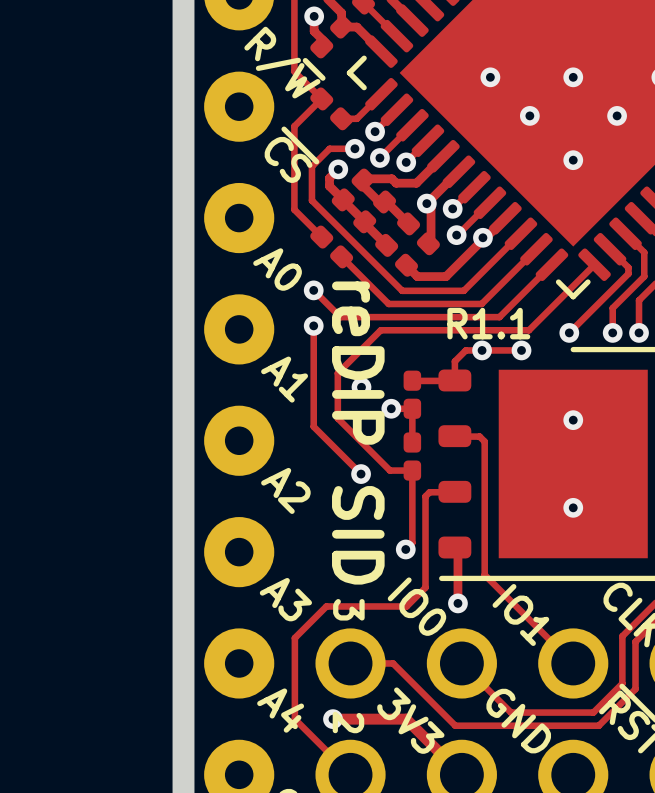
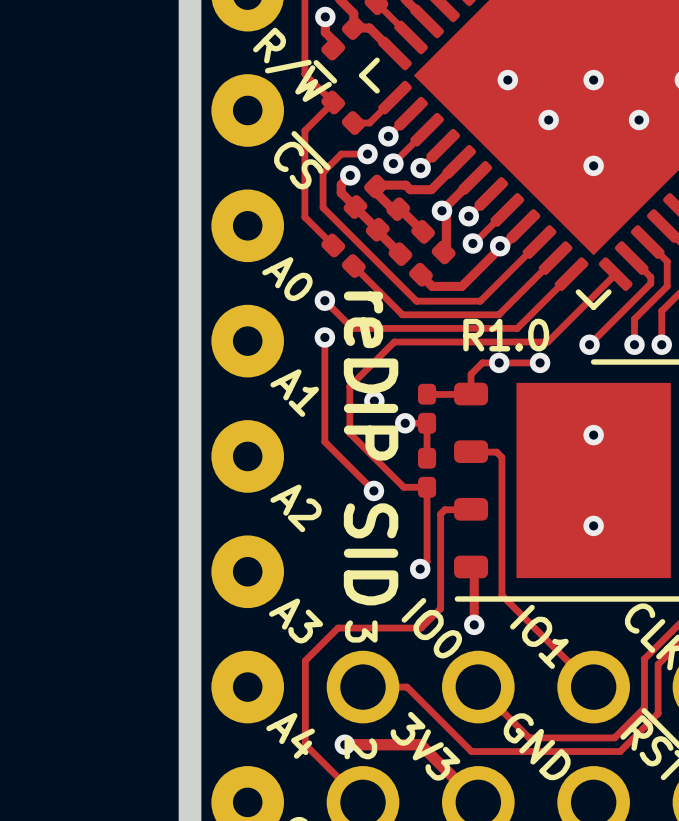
text: R1.1 (488, 323) -> R1.0 (506, 335)

